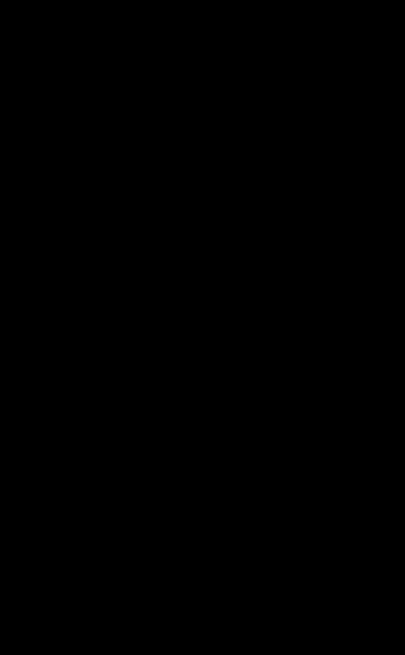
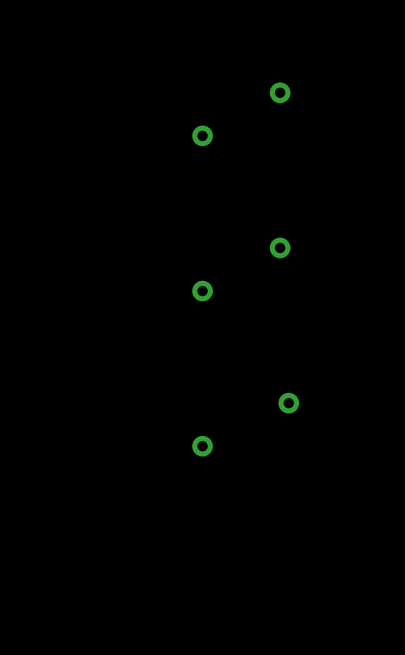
via: none -> (280, 92)
via: none -> (202, 135)
via: none -> (280, 247)
via: none -> (202, 291)
via: none -> (288, 403)
via: none -> (202, 446)

